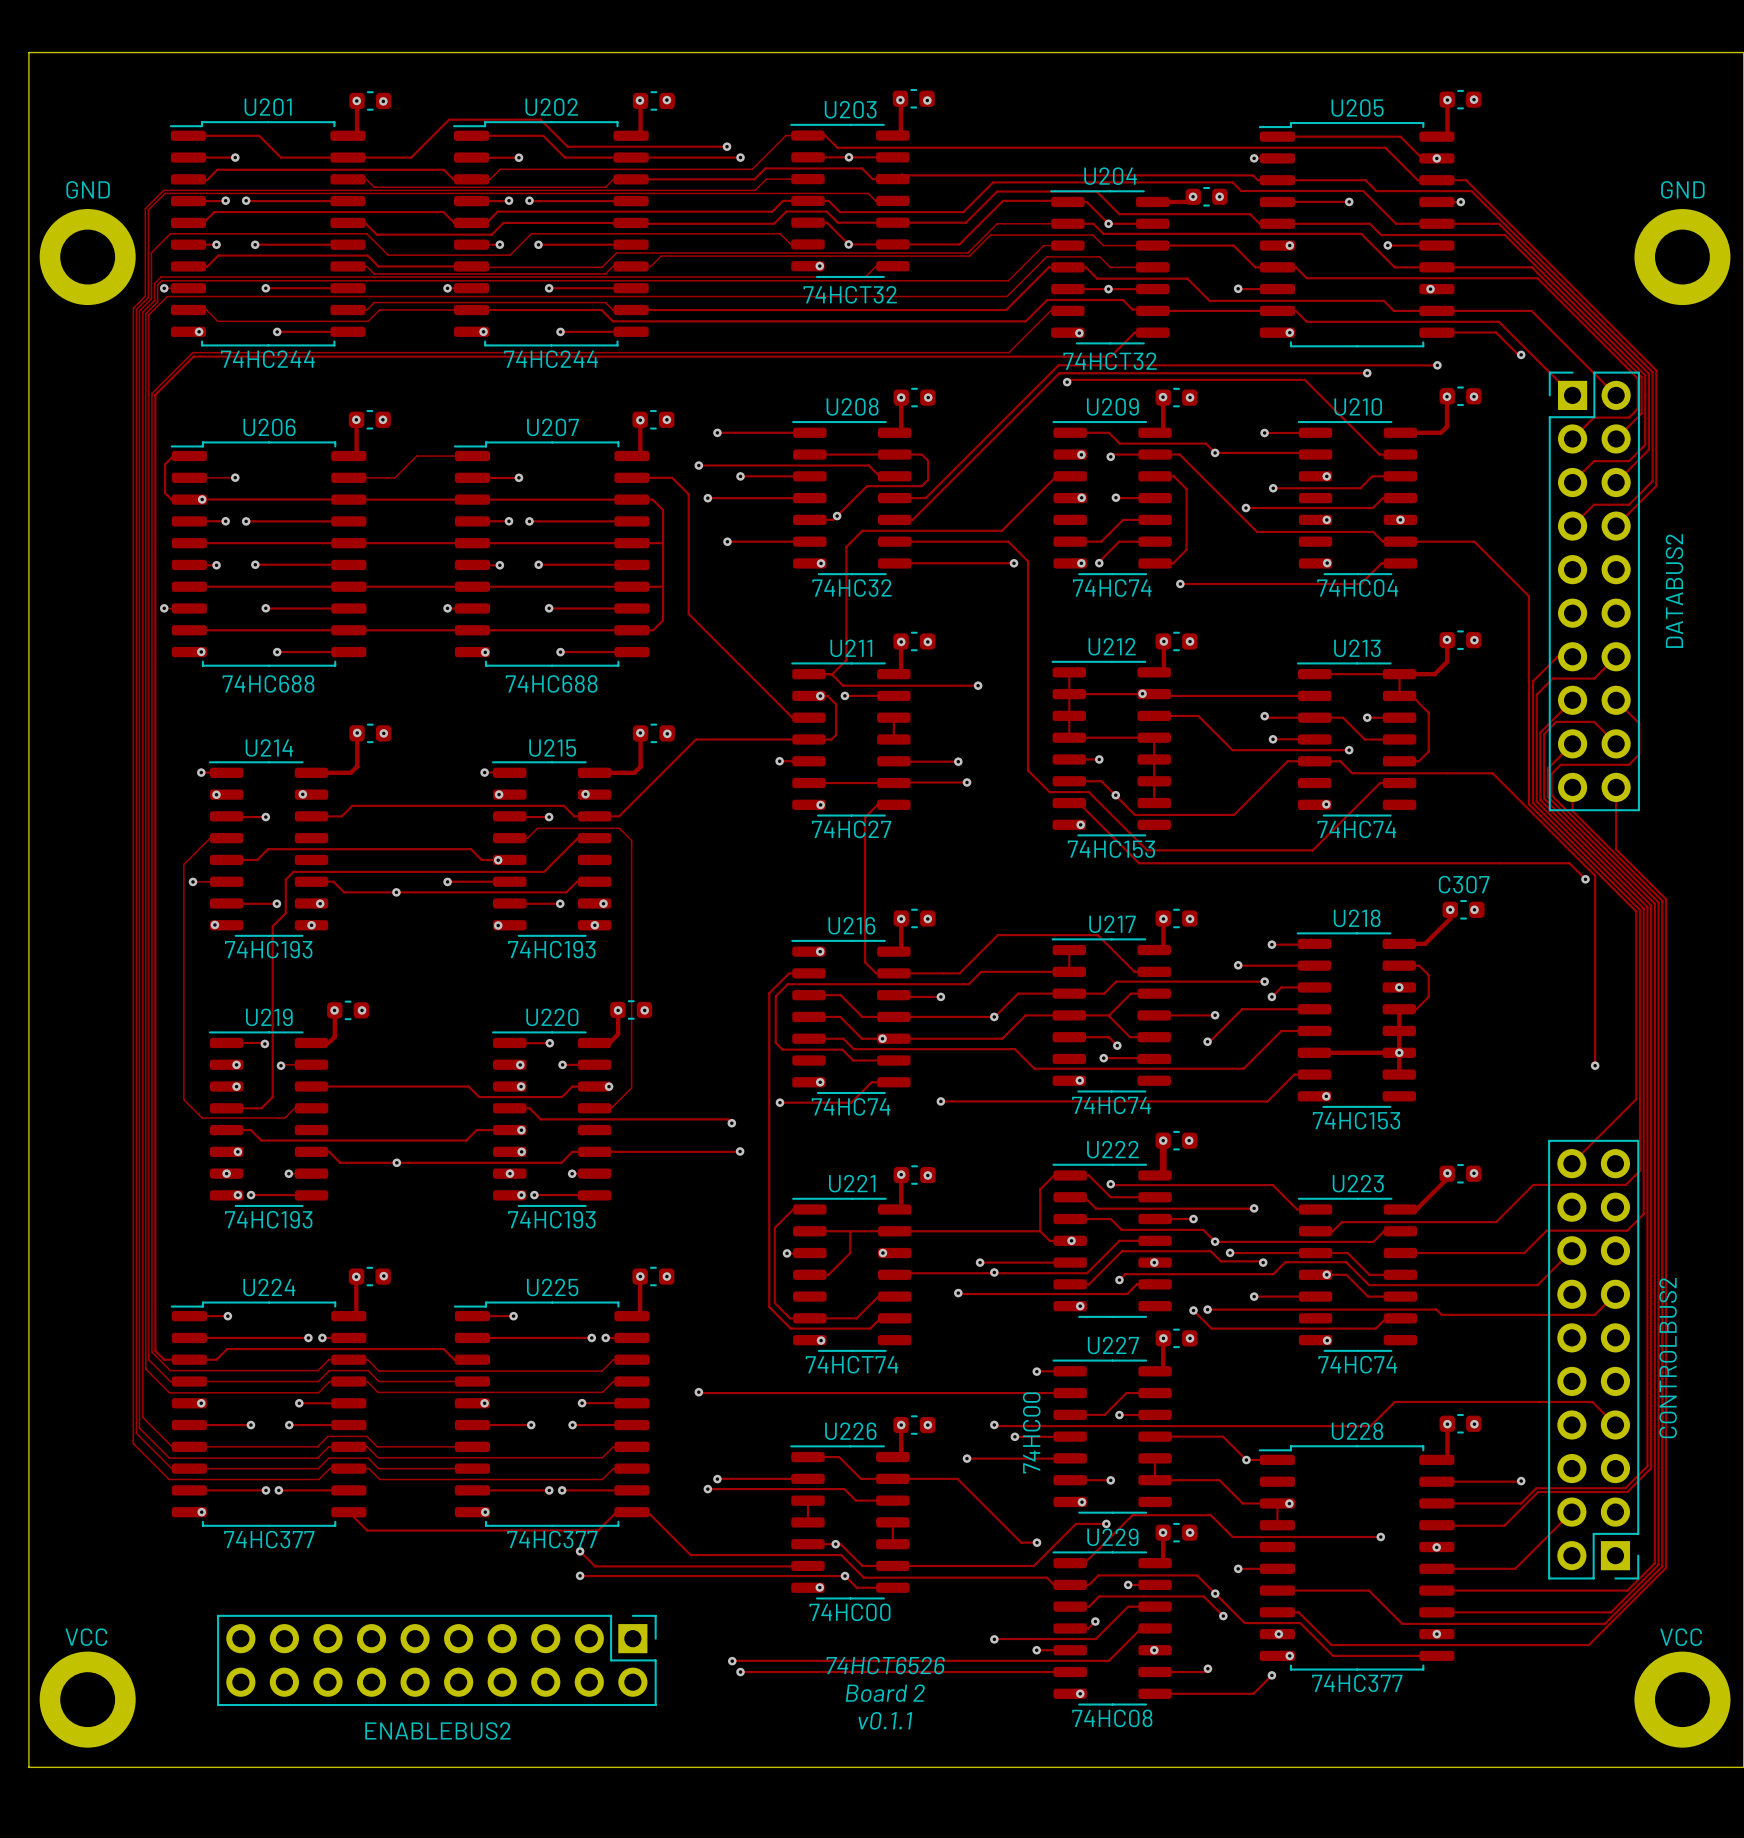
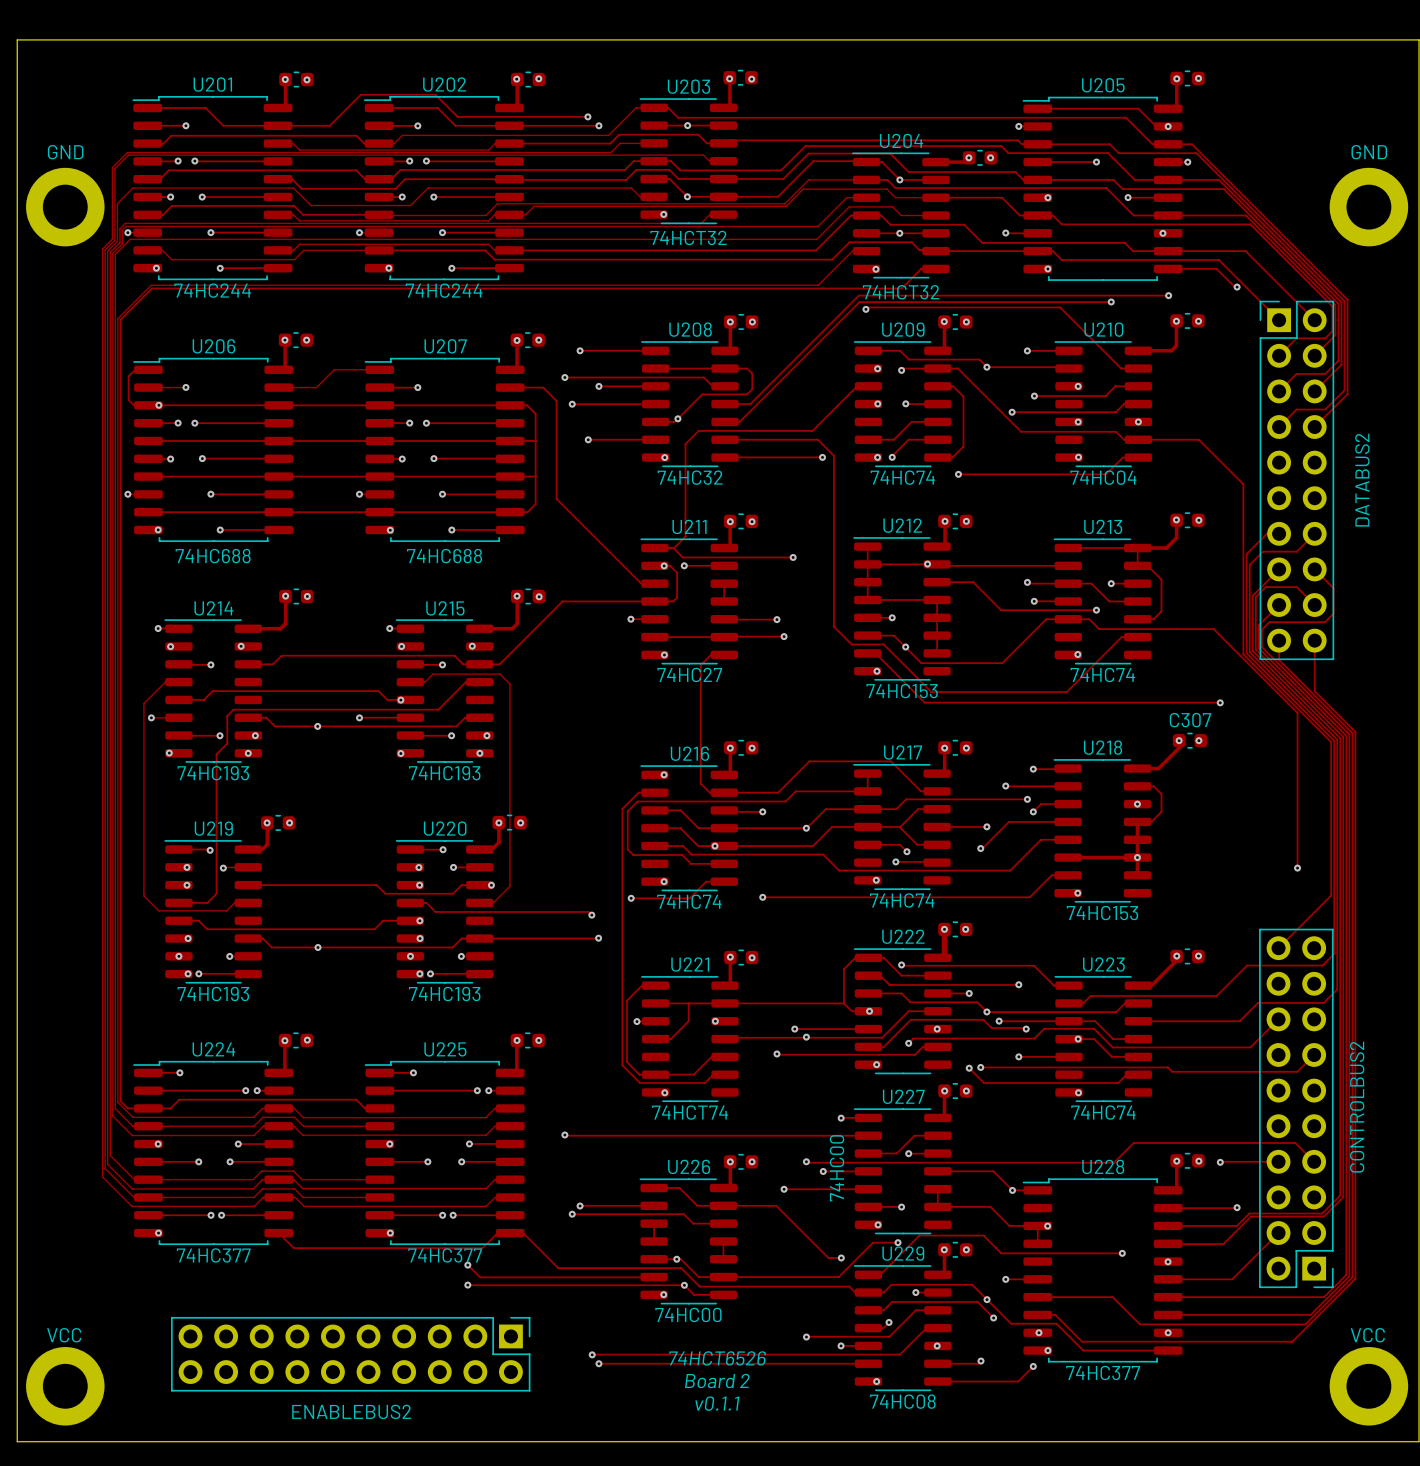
track: (1500, 863) (1569, 863) (1585, 879) -> none
via position: (1585, 879) -> (1220, 702)
track: none -> (1278, 1161) (1220, 1162)
via: none -> (1220, 1162)

